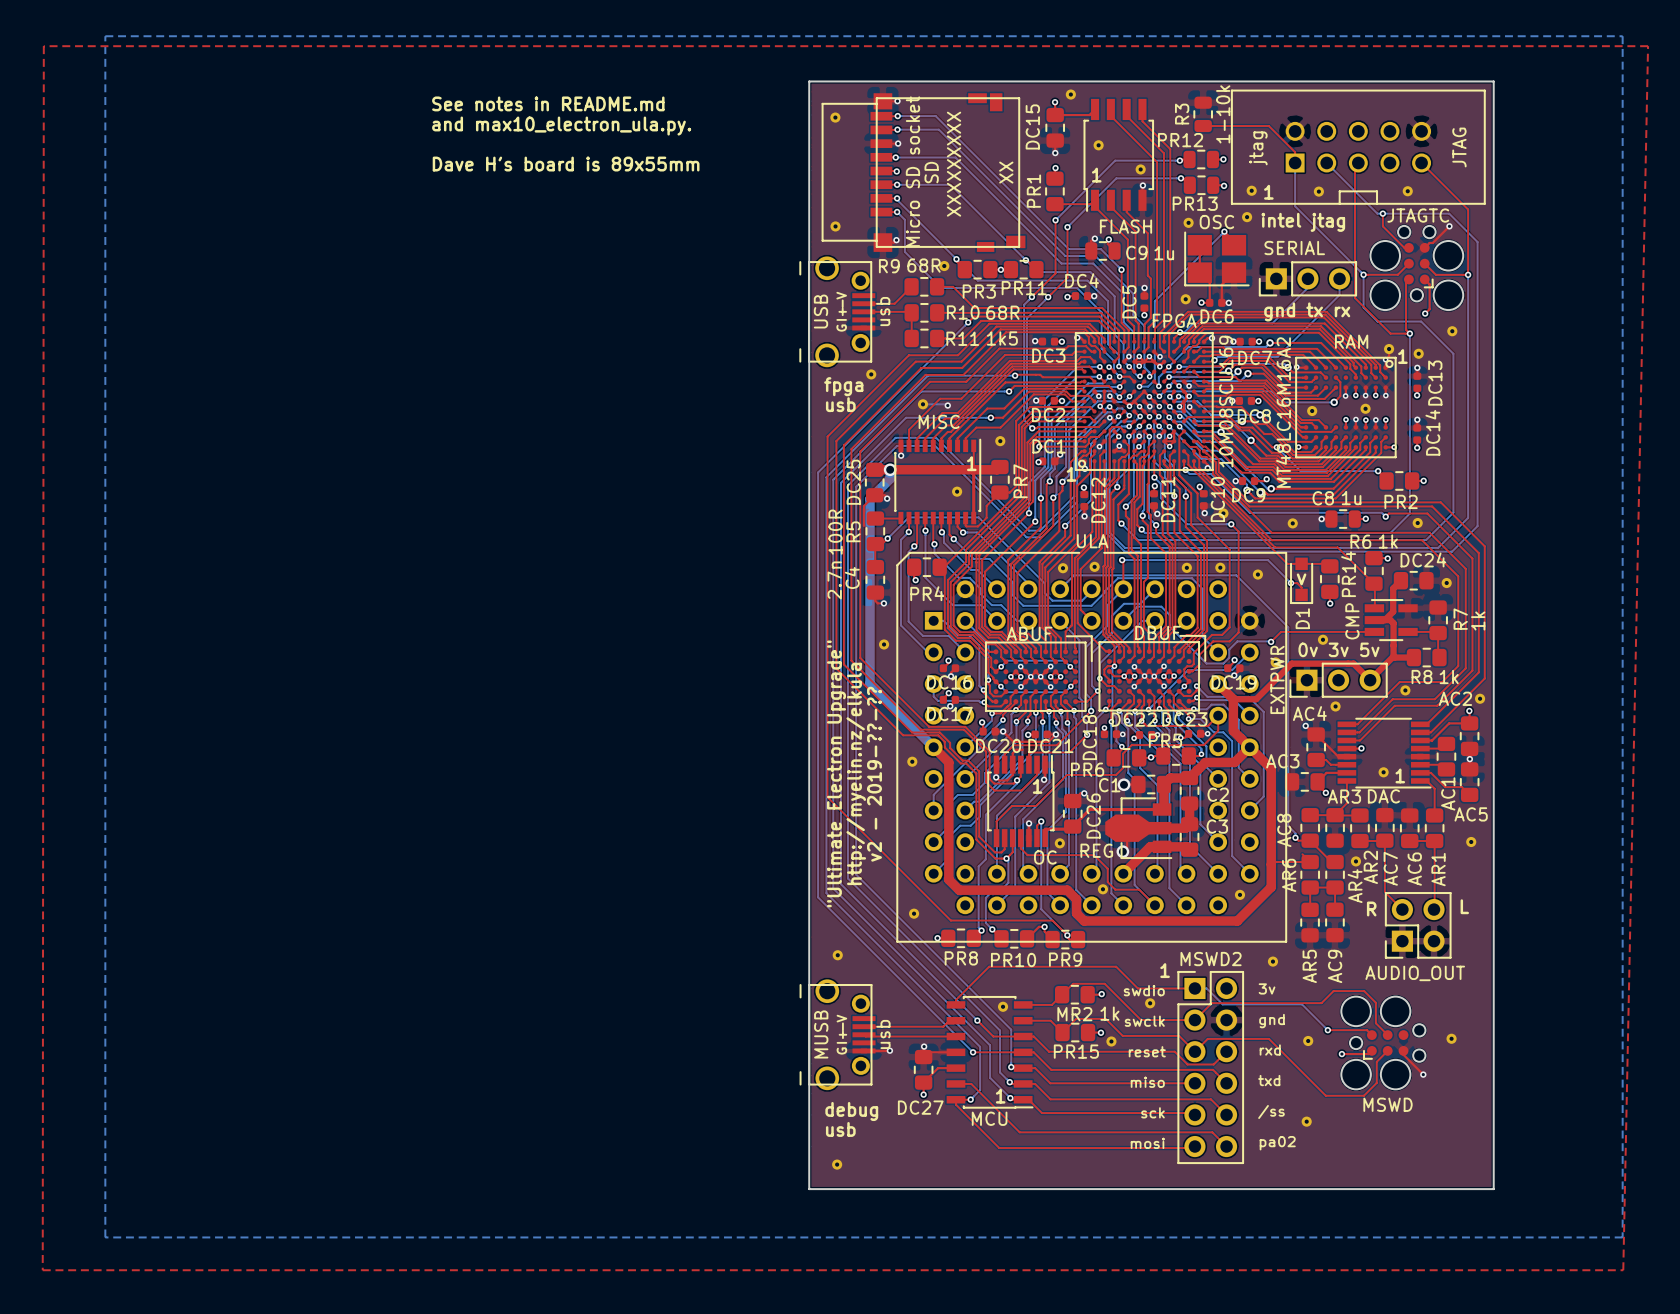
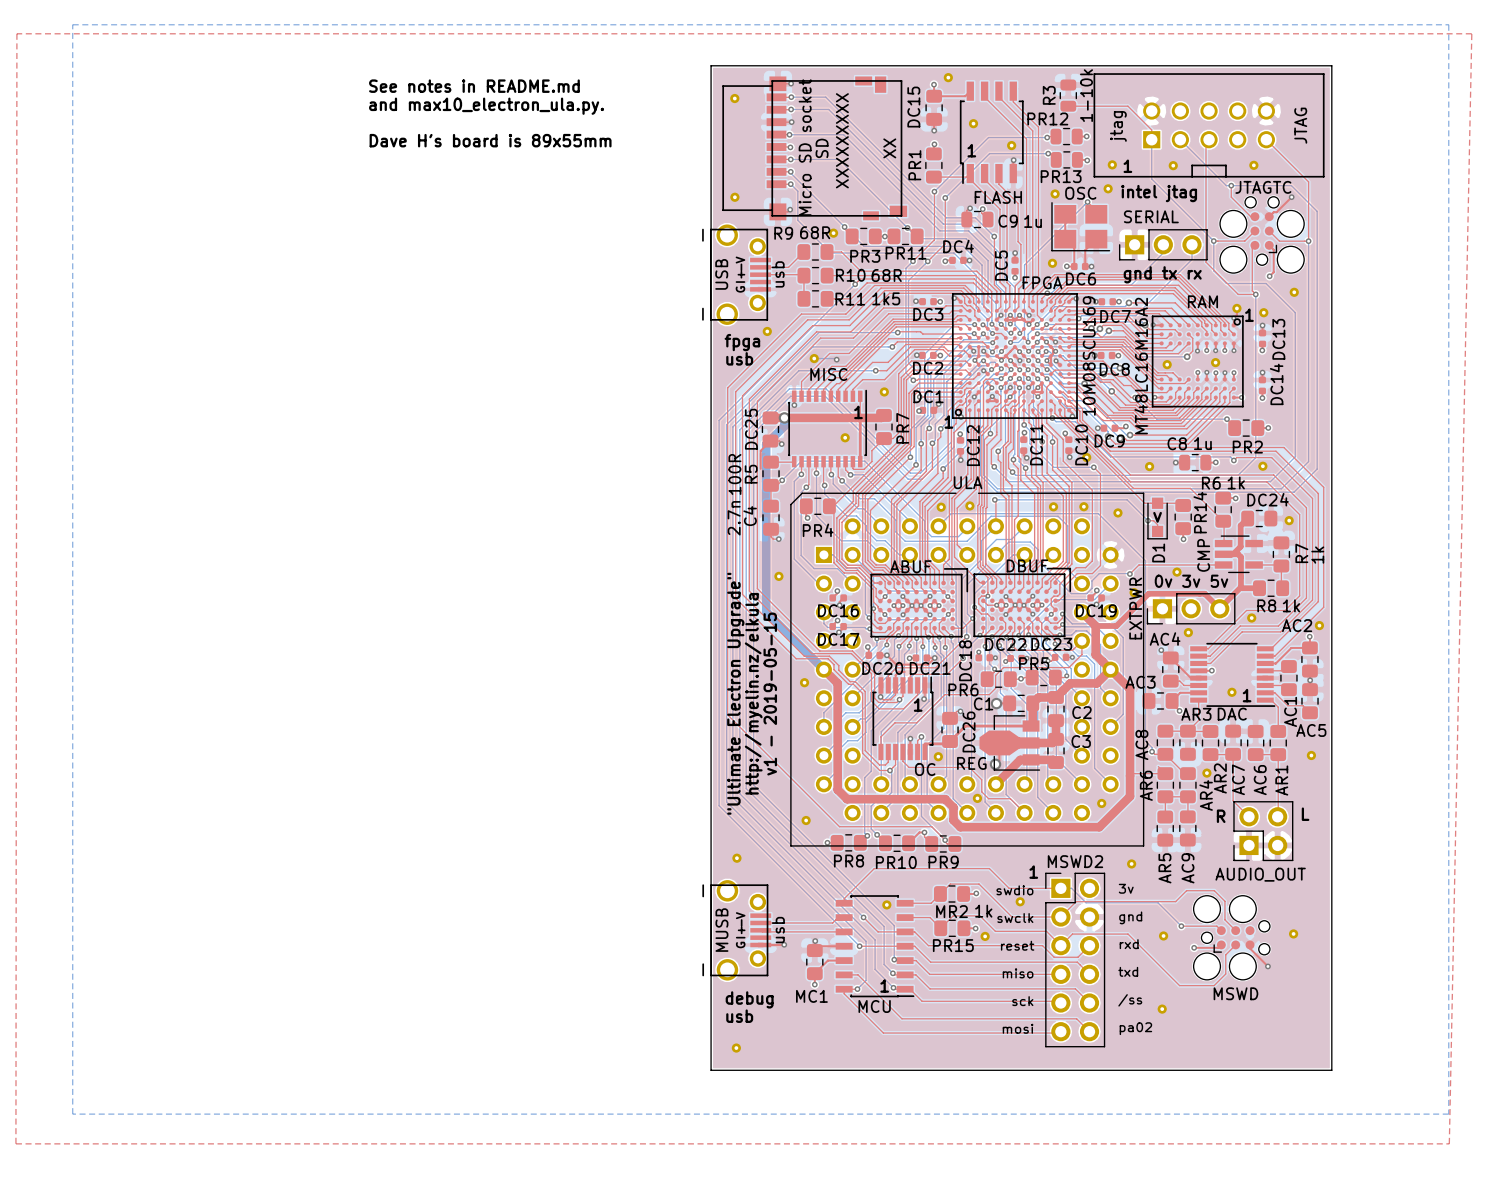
text: v2 - 2019-??-?? (874, 774) -> v1 - 2019-05-15 (770, 694)
DC27 name: DC27 (920, 1107) -> MC1 (811, 996)

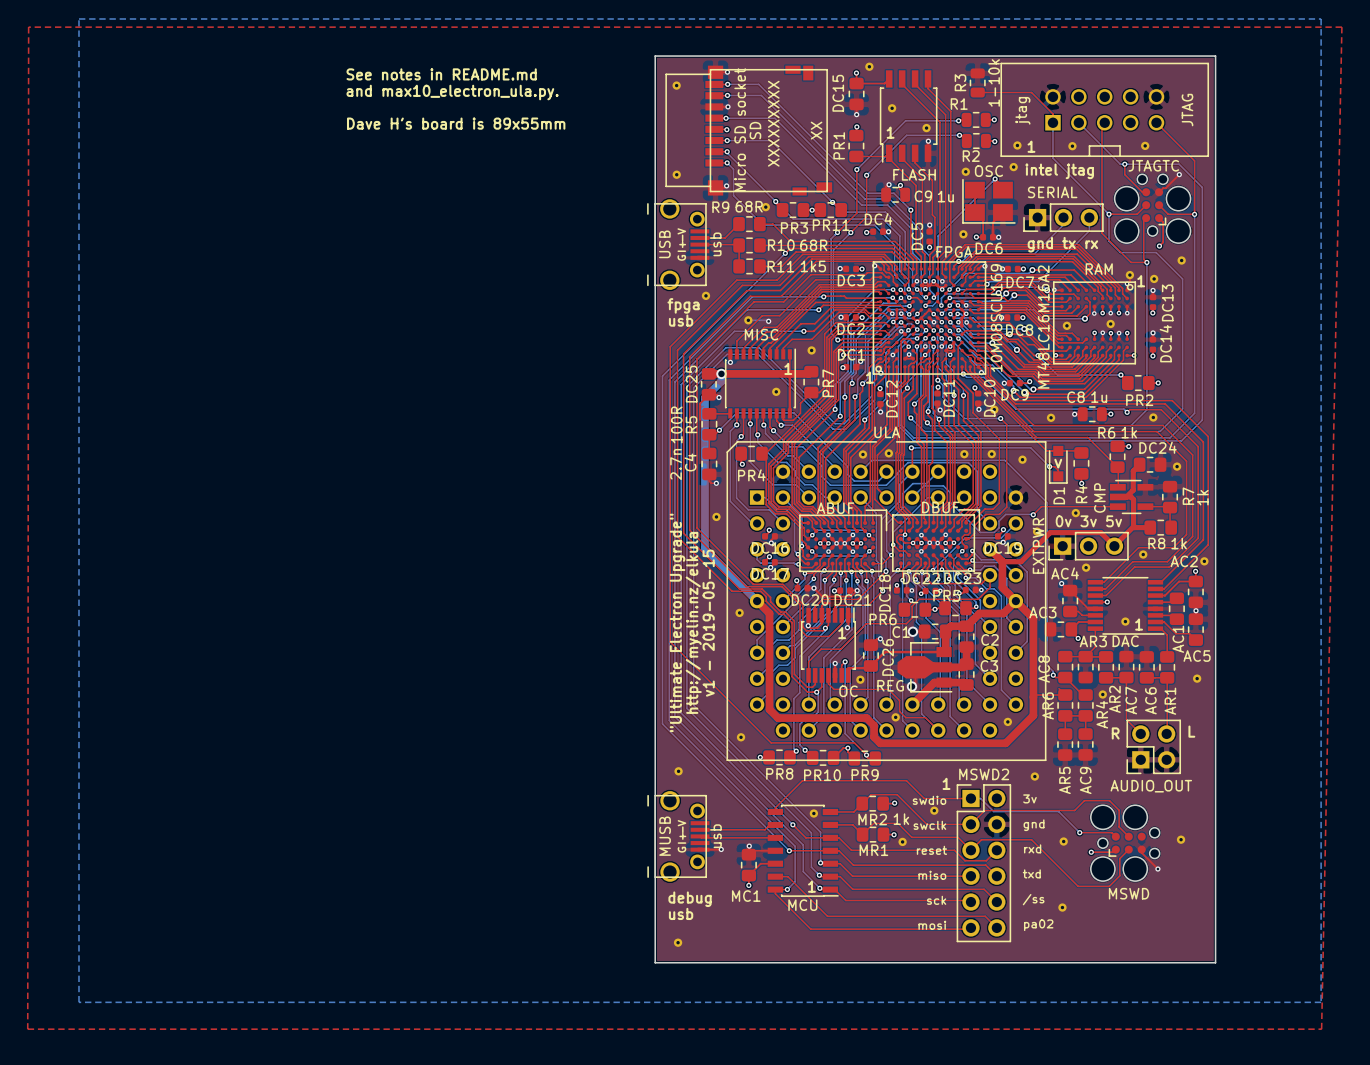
PR12 name: PR12 (1047, 118) -> R1 (959, 104)
PR13 name: PR13 (1061, 176) -> R2 (971, 156)
PR14 name: PR14 (1200, 512) -> R4 (1081, 494)
PR15 name: PR15 (953, 945) -> MR1 (873, 850)

